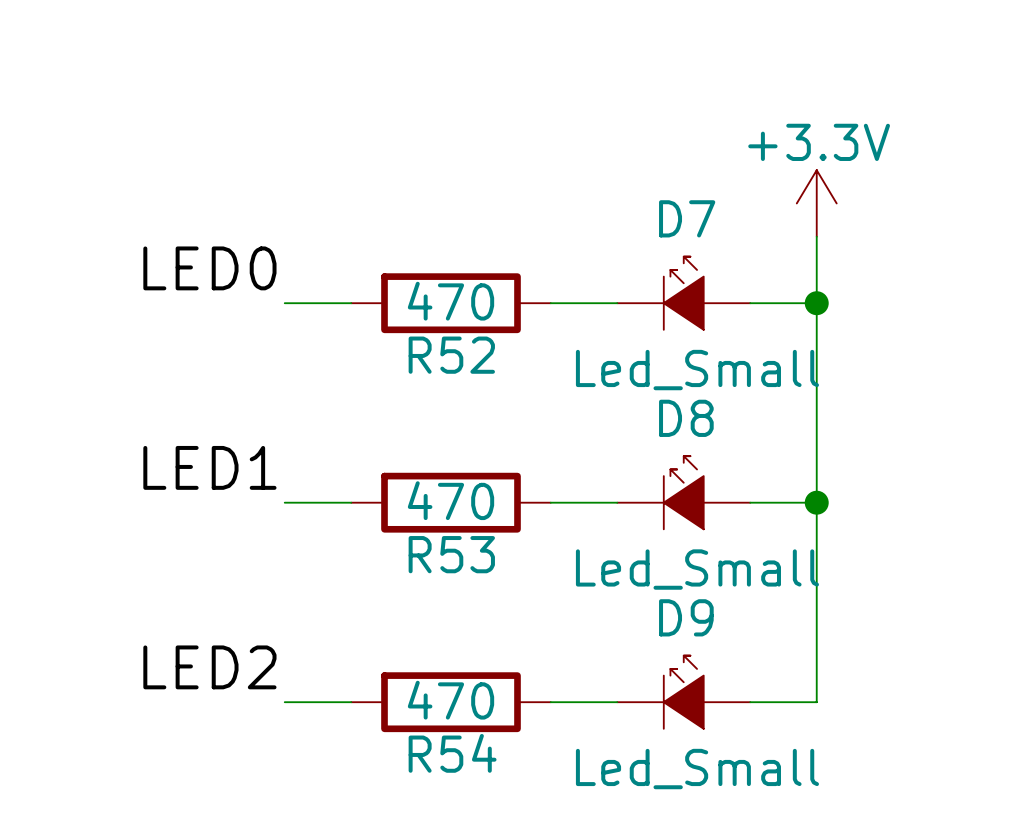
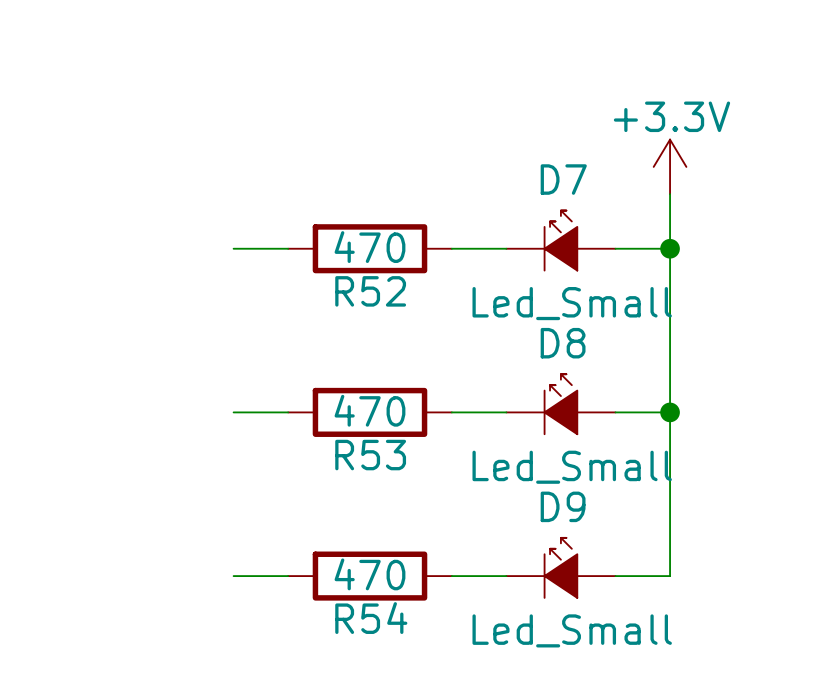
label: LED0 (209, 268) -> none
label: LED1 (209, 467) -> none
label: LED2 (209, 667) -> none

